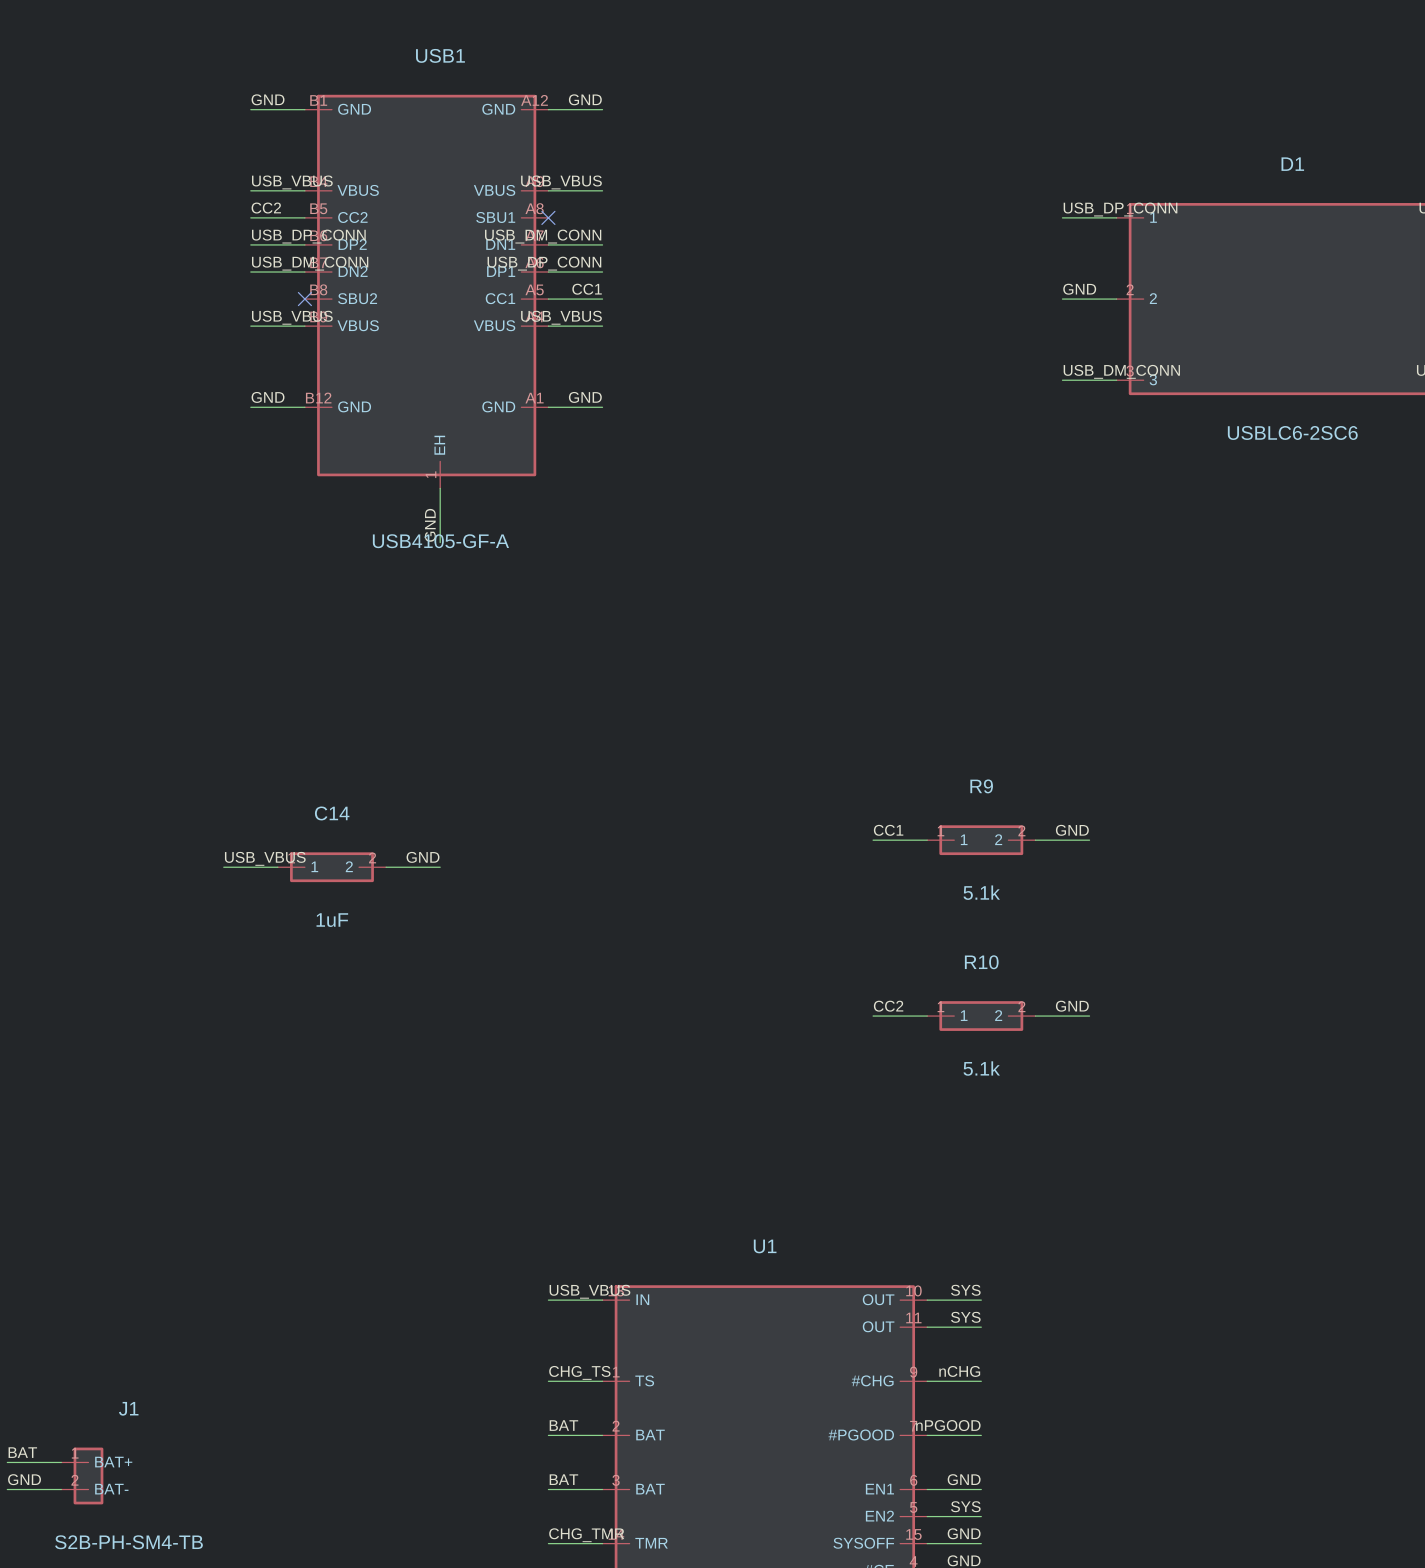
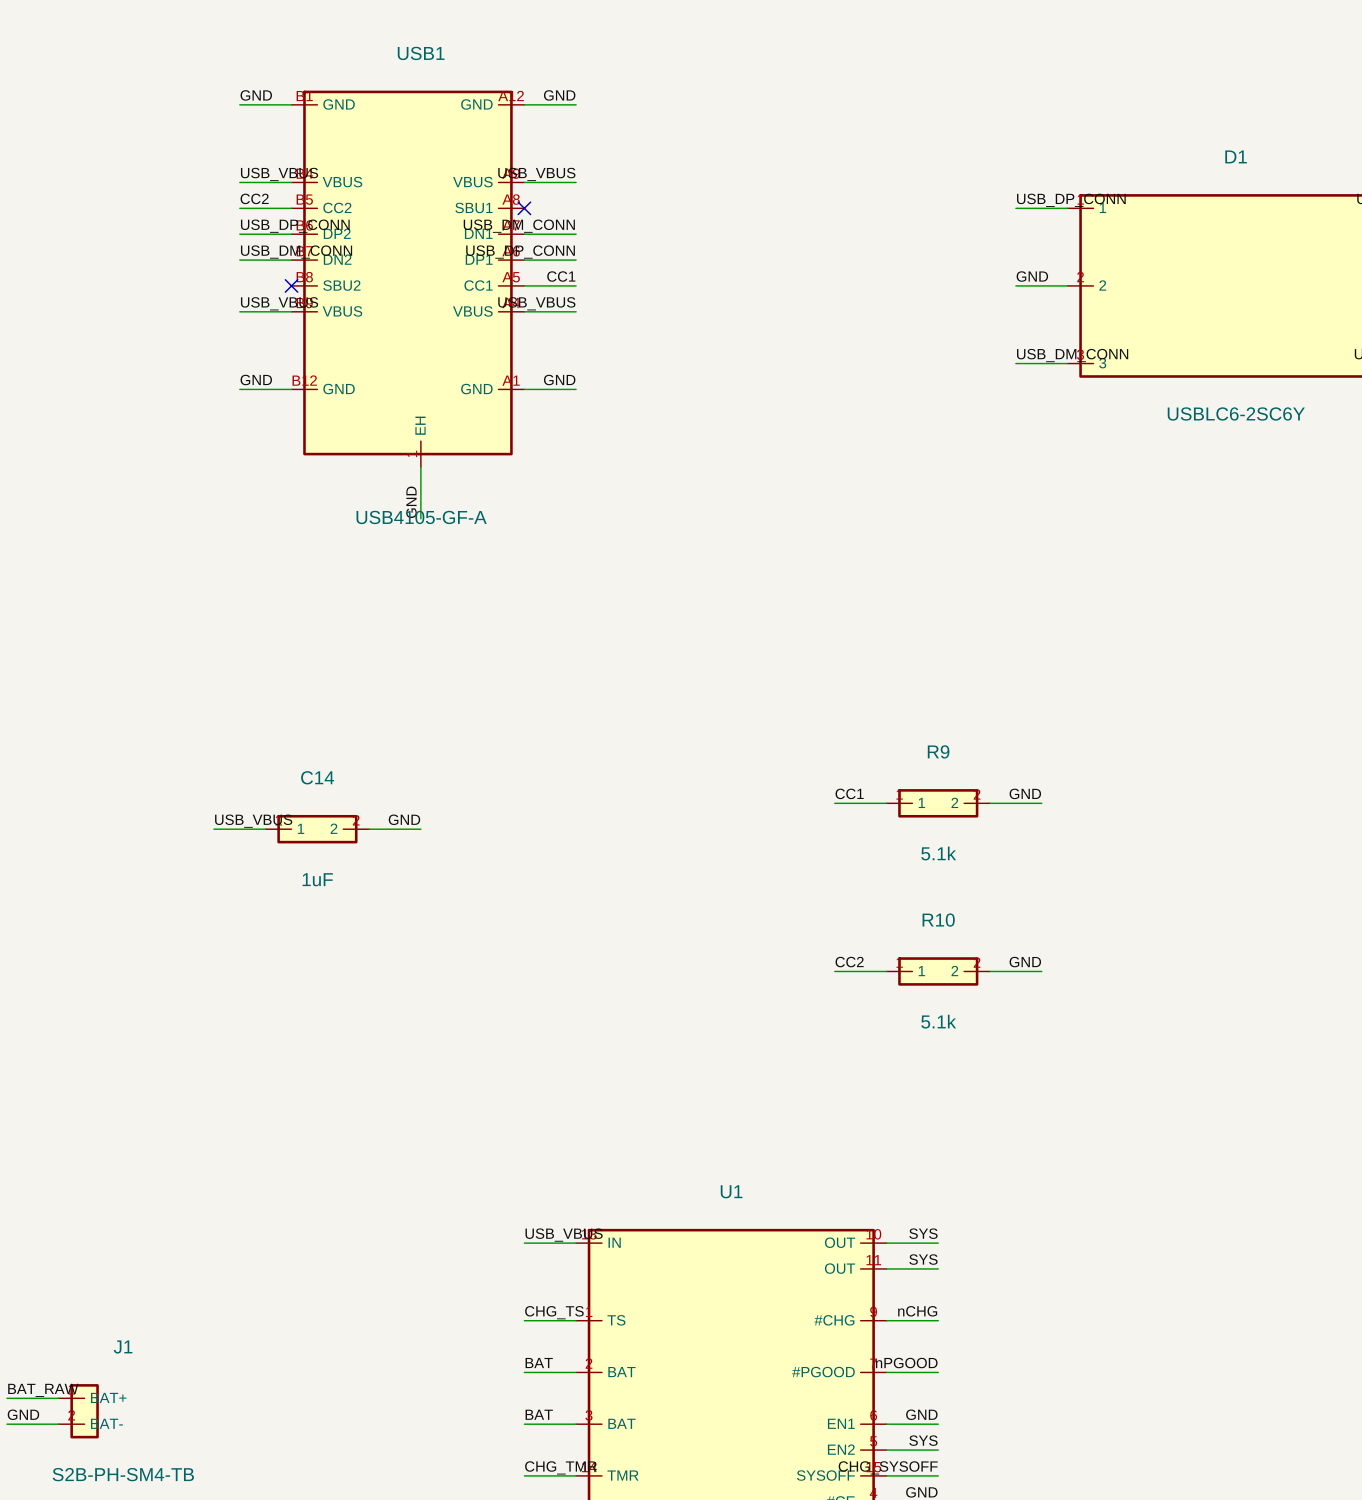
D1 value: USBLC6-2SC6 (1292, 432) -> USBLC6-2SC6Y (1236, 413)
label: BAT (22, 1452) -> BAT_RAW (43, 1390)
label: GND (964, 1533) -> CHG_SYSOFF (888, 1467)

